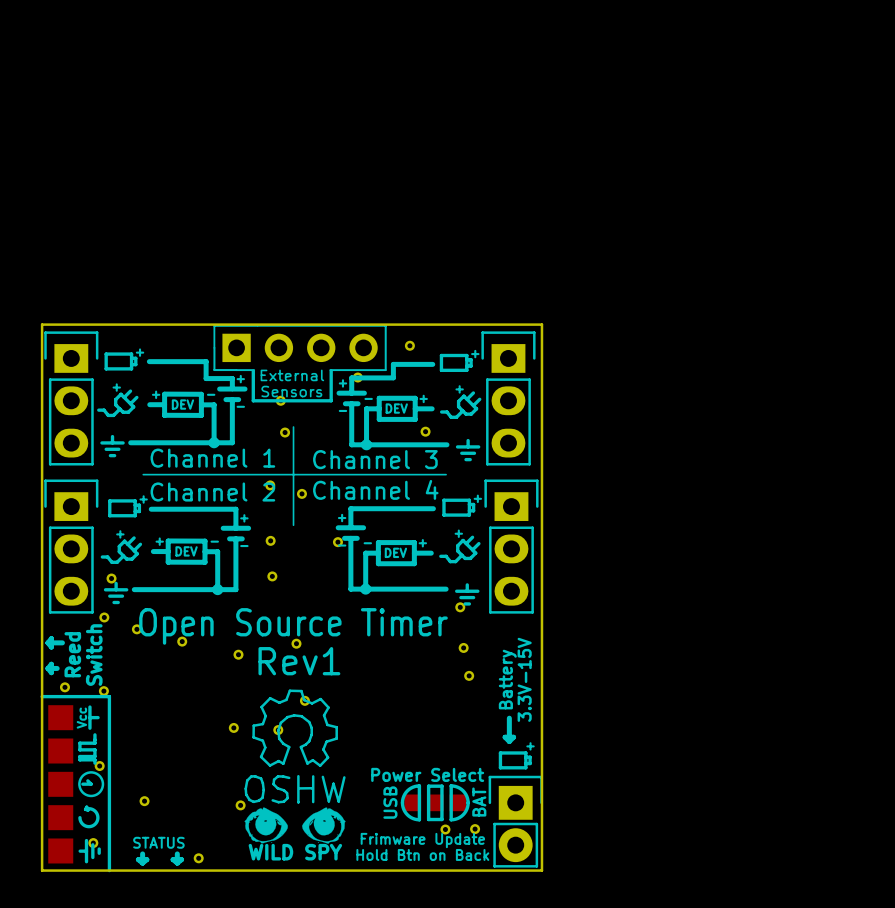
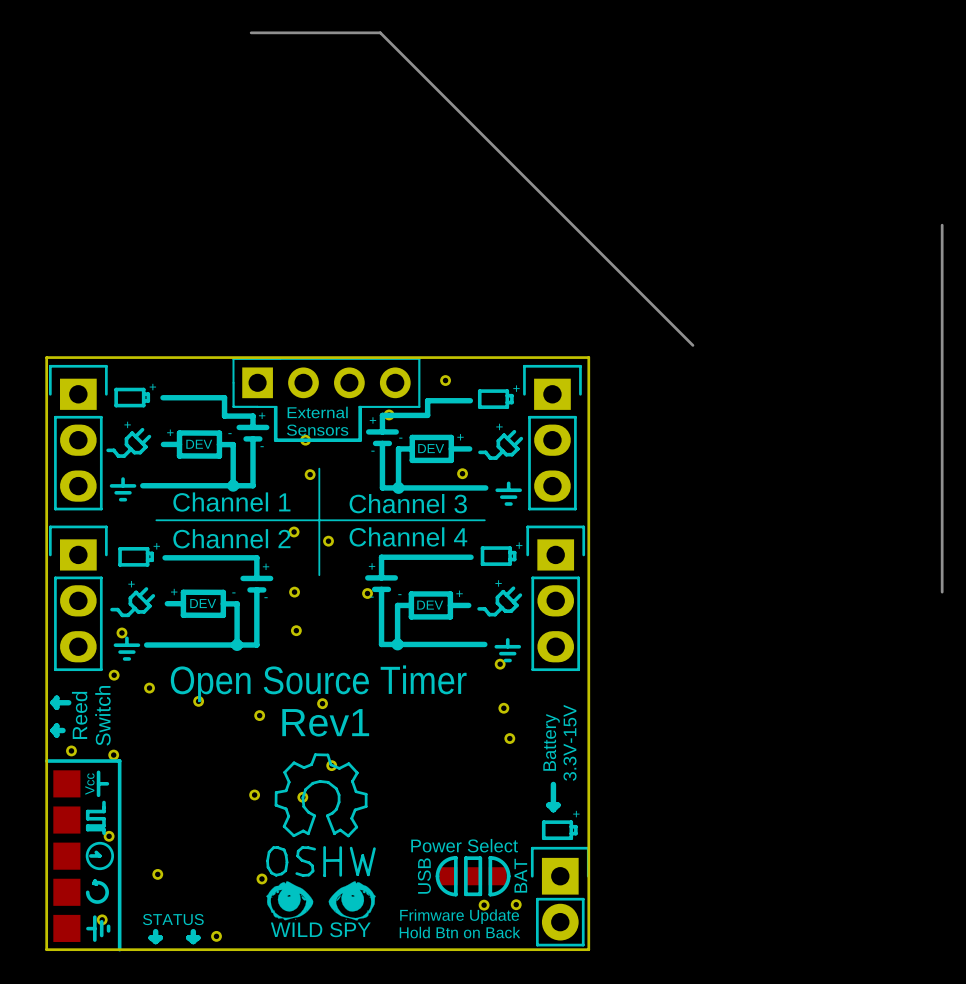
line: none -> (251, 32) (380, 32) (692, 345)
line: none -> (942, 225) (942, 592)

